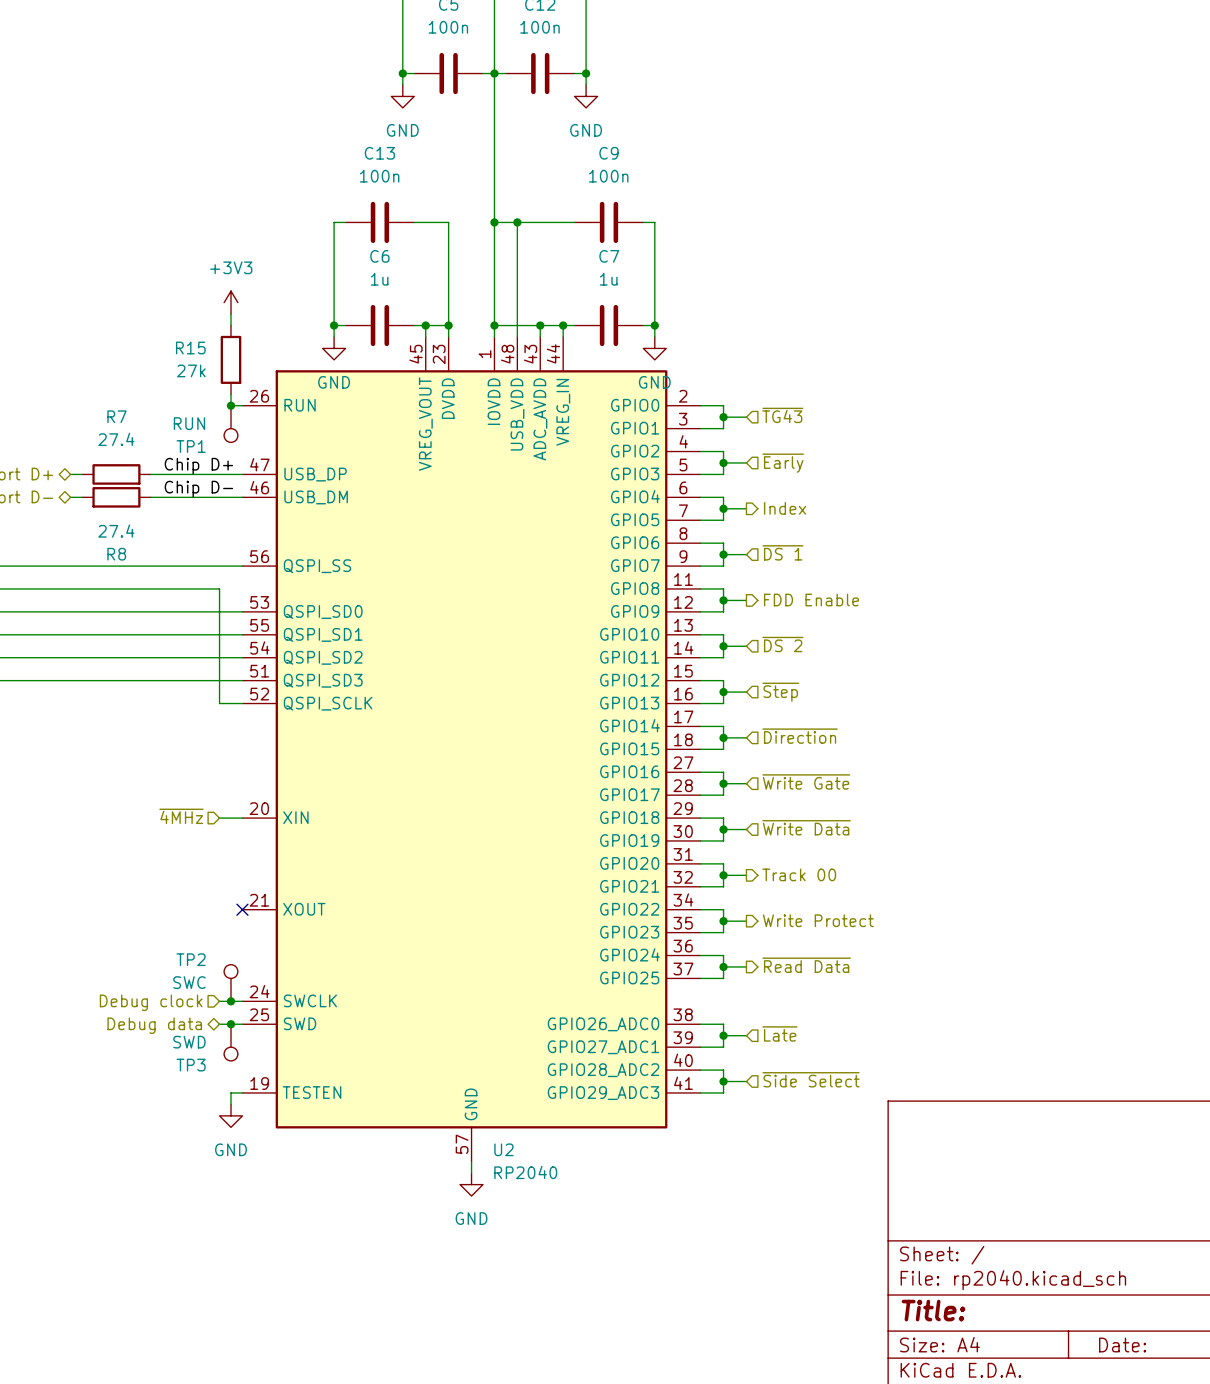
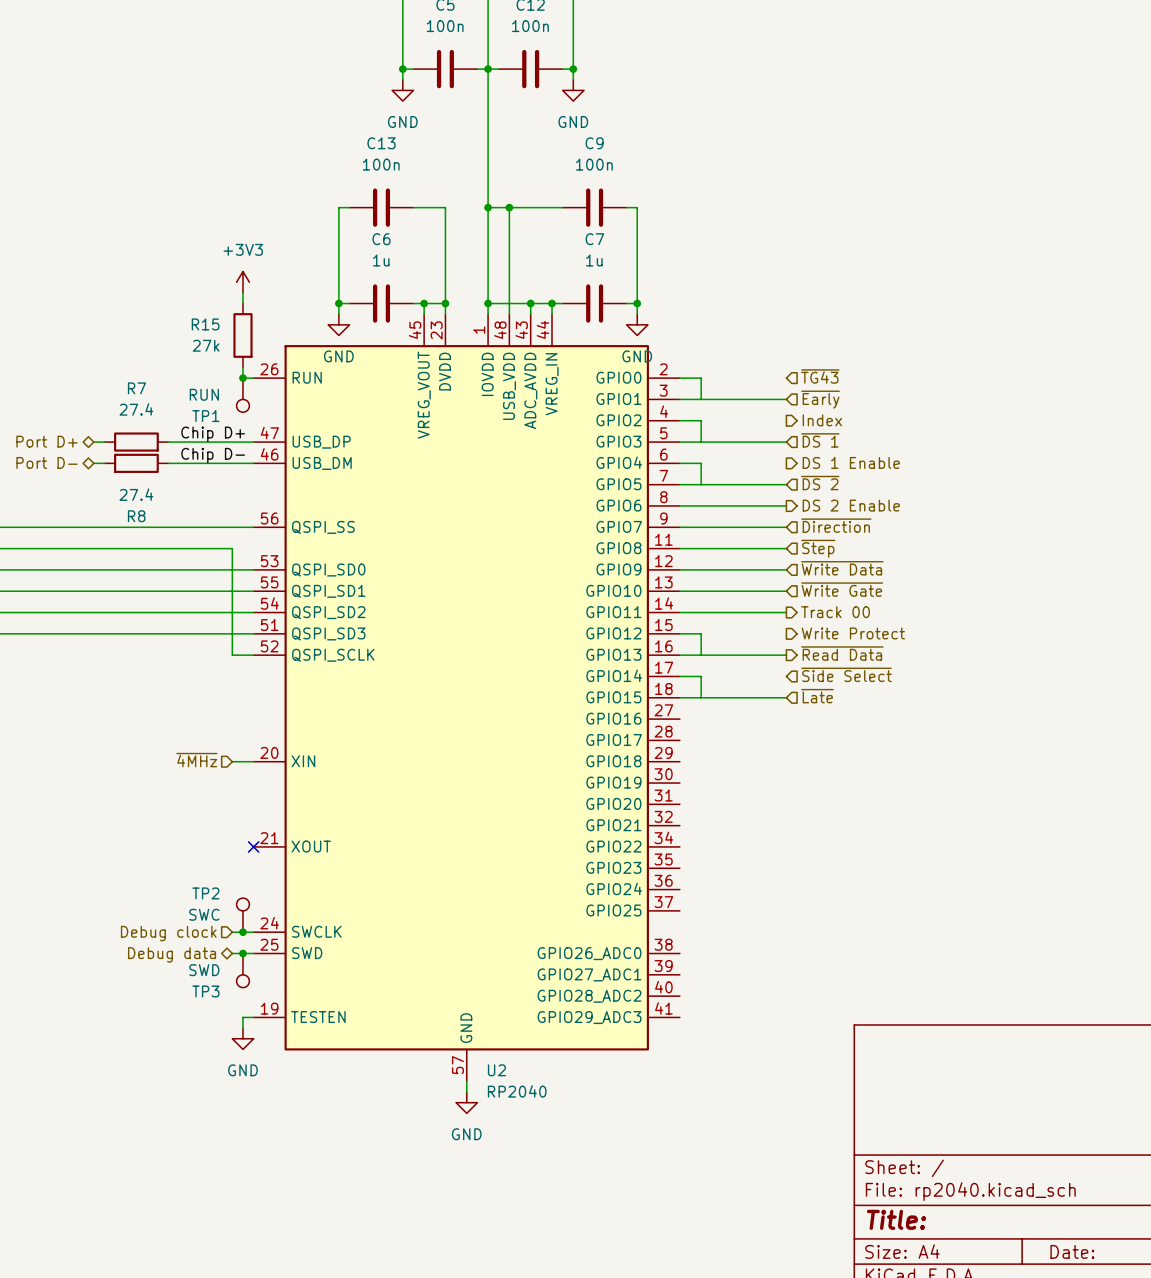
hierarchical label position: ~{TG43} (782, 415) -> ~{TG43} (820, 376)
wire: (723, 417) (746, 417) -> none
junction: (723, 417) -> none
wire: none -> (701, 399) (786, 399)
wire: (723, 462) (746, 462) -> none
junction: (723, 462) -> none
hierarchical label position: ~{Early} (783, 463) -> ~{Early} (820, 399)
wire: none -> (701, 442) (786, 442)
hierarchical label: none -> DS 1 Enable (851, 462)
wire: (723, 508) (746, 508) -> none
junction: (723, 508) -> none
hierarchical label position: Index (785, 508) -> Index (822, 420)
wire: none -> (701, 484) (786, 484)
hierarchical label: none -> DS 2 Enable (851, 505)
wire: (723, 543) (723, 566) -> (701, 505) (786, 505)
hierarchical label position: ~{DS 1} (782, 552) -> ~{DS 1} (820, 440)
wire: (723, 554) (746, 554) -> none
junction: (723, 554) -> none
wire: none -> (701, 527) (786, 527)
wire: (723, 588) (723, 611) -> (701, 548) (786, 548)
wire: (723, 600) (746, 600) -> none
junction: (723, 600) -> none
hierarchical label: FDD Enable (811, 600) -> none
hierarchical label: none -> ~{Write Data} (842, 568)
wire: none -> (701, 569) (786, 569)
wire: (723, 634) (723, 657) -> (701, 591) (786, 591)
hierarchical label position: ~{DS 2} (782, 644) -> ~{DS 2} (820, 483)
wire: (723, 646) (746, 646) -> none
junction: (723, 646) -> none
wire: none -> (701, 612) (786, 612)
hierarchical label: none -> Track 00 (835, 612)
hierarchical label: none -> Write Protect (853, 633)
wire: (723, 692) (746, 692) -> none
junction: (723, 692) -> none
hierarchical label position: ~{Step} (780, 692) -> ~{Step} (818, 548)
hierarchical label: none -> ~{Read Data} (842, 653)
wire: none -> (701, 655) (786, 655)
hierarchical label: none -> ~{Side Select} (846, 674)
hierarchical label position: ~{Direction} (800, 736) -> ~{Direction} (836, 525)
wire: (723, 737) (746, 737) -> none
junction: (723, 737) -> none
hierarchical label: none -> ~{Late} (817, 696)
wire: none -> (701, 697) (786, 697)
wire: (700, 772) (723, 772) (723, 795) (700, 795) -> none
hierarchical label position: ~{Write Gate} (806, 781) -> ~{Write Gate} (842, 589)
wire: (723, 783) (746, 783) -> none
junction: (723, 783) -> none
wire: (700, 818) (723, 818) (723, 840) (700, 840) -> none
hierarchical label: ~{Write Data} (806, 827) -> none
wire: (723, 829) (746, 829) -> none
junction: (723, 829) -> none
wire: (700, 863) (723, 863) (723, 886) (700, 886) -> none
hierarchical label: Track 00 (799, 874) -> none
wire: (723, 875) (746, 875) -> none
junction: (723, 875) -> none
wire: (700, 909) (723, 909) (723, 932) (700, 932) -> none
hierarchical label: Write Protect (818, 920) -> none
wire: (723, 921) (746, 921) -> none
junction: (723, 921) -> none
wire: (700, 955) (723, 955) (723, 978) (700, 978) -> none
hierarchical label: ~{Read Data} (806, 965) -> none
wire: (723, 966) (746, 966) -> none
junction: (723, 966) -> none
wire: (700, 1024) (723, 1024) (723, 1047) (700, 1047) -> none
hierarchical label: ~{Late} (779, 1033) -> none
wire: (723, 1035) (746, 1035) -> none
junction: (723, 1035) -> none
wire: (700, 1070) (723, 1070) (723, 1092) (700, 1092) -> none
hierarchical label: ~{Side Select} (811, 1079) -> none
wire: (723, 1081) (746, 1081) -> none
junction: (723, 1081) -> none

